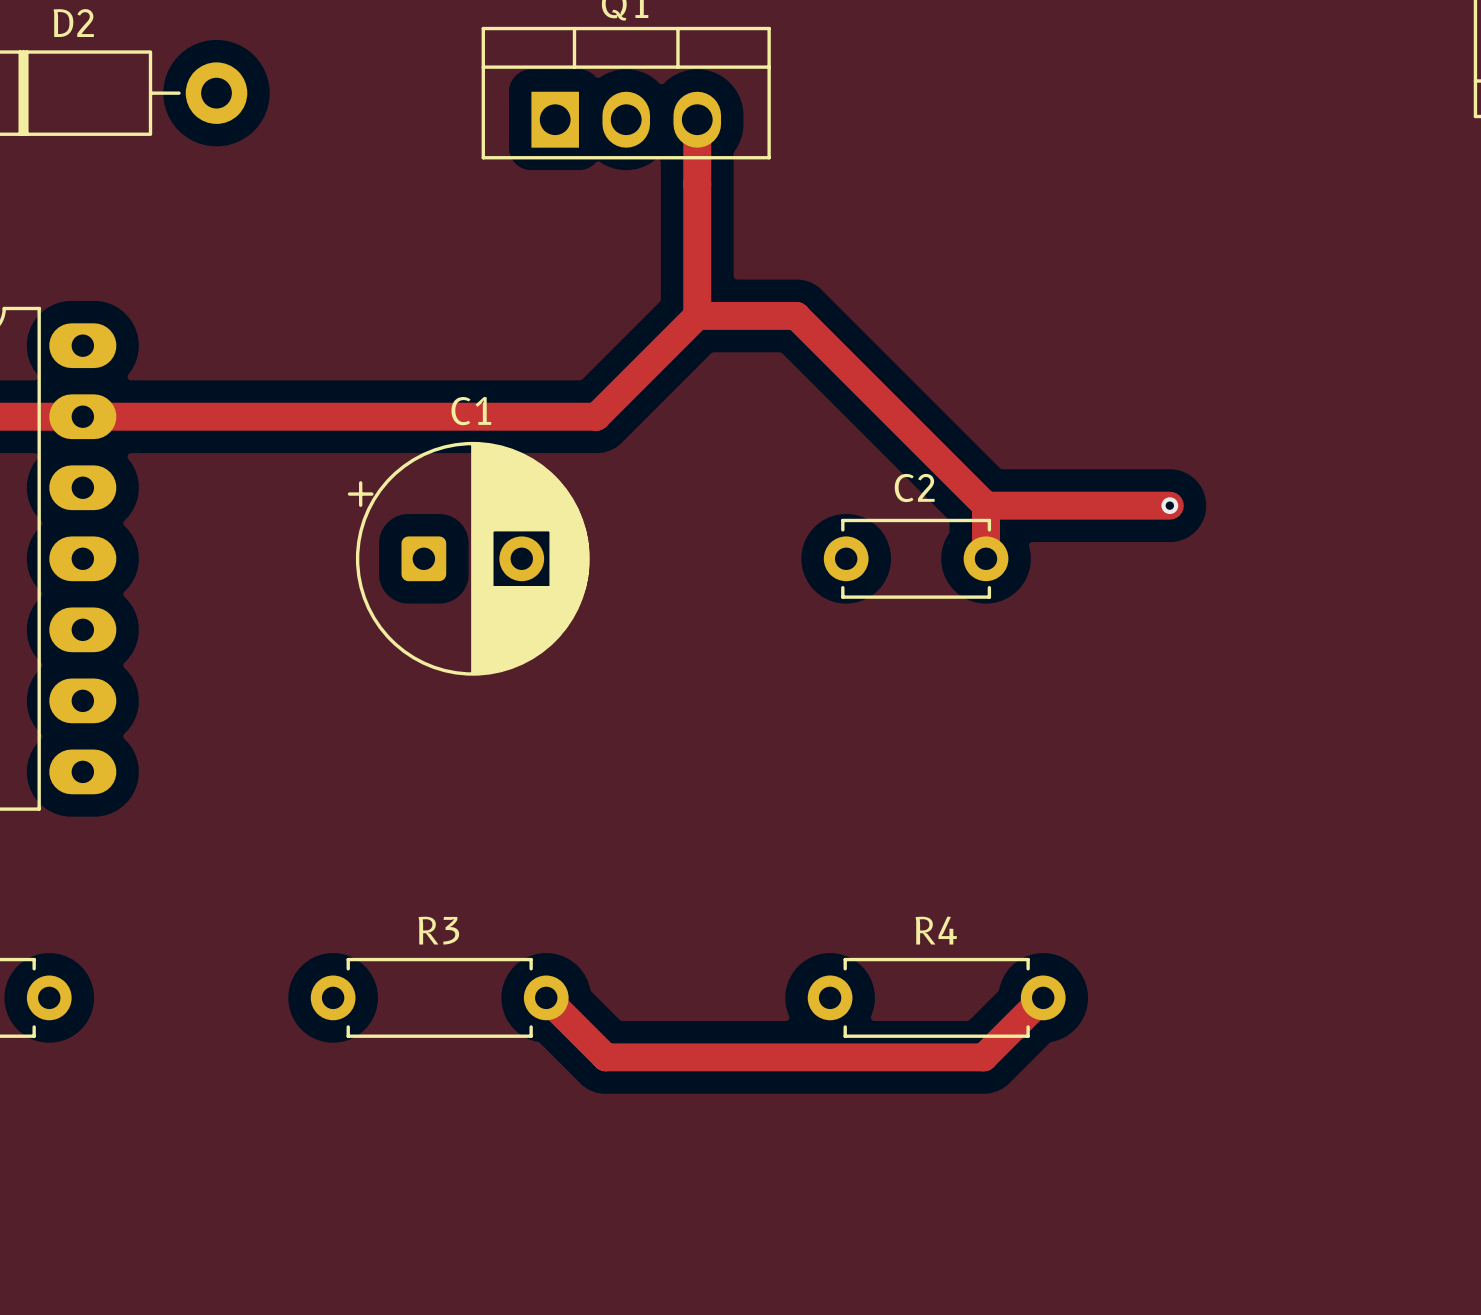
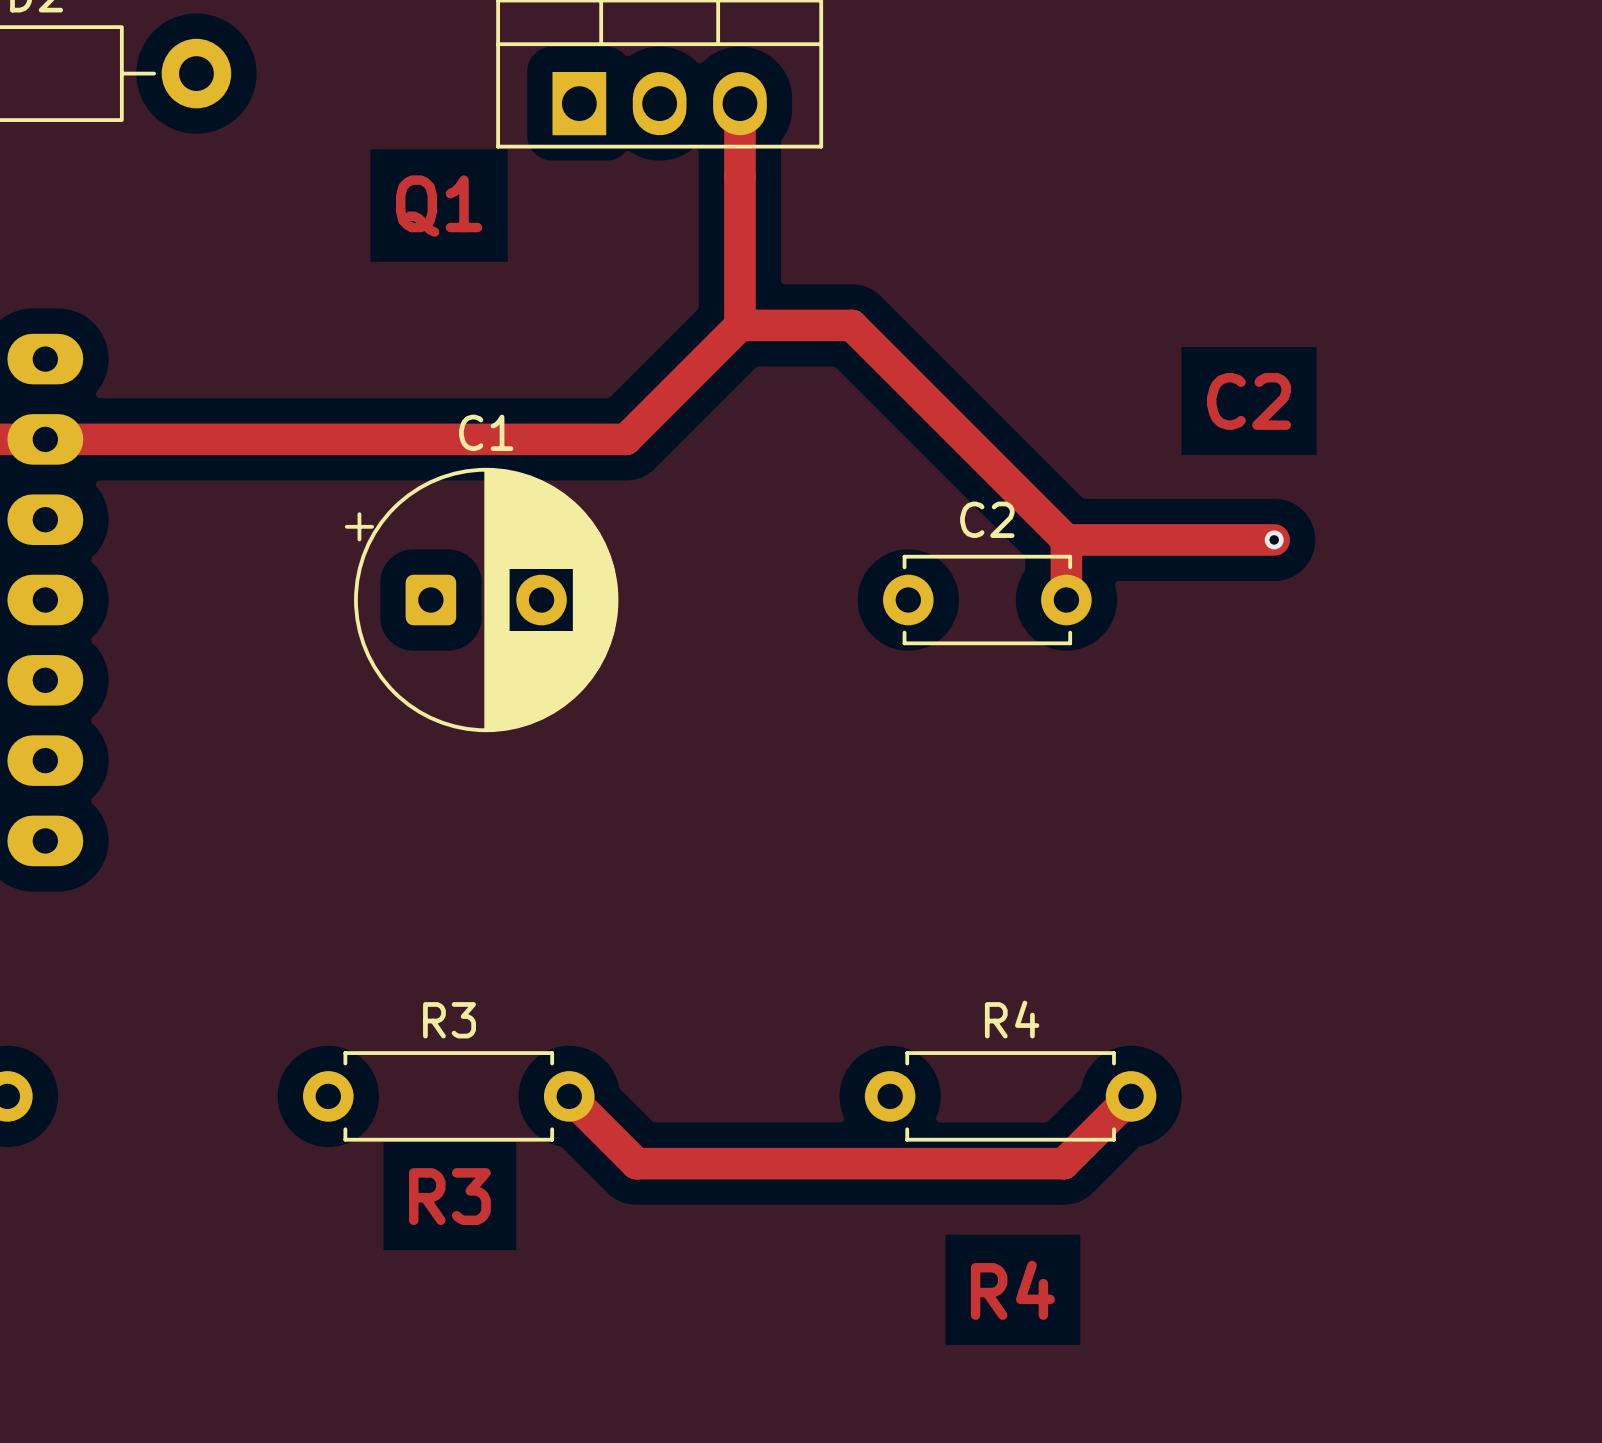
text: none -> Q1 (439, 206)
text: none -> C2 (1248, 401)
text: none -> R3 (449, 1196)
text: none -> R4 (1012, 1290)

